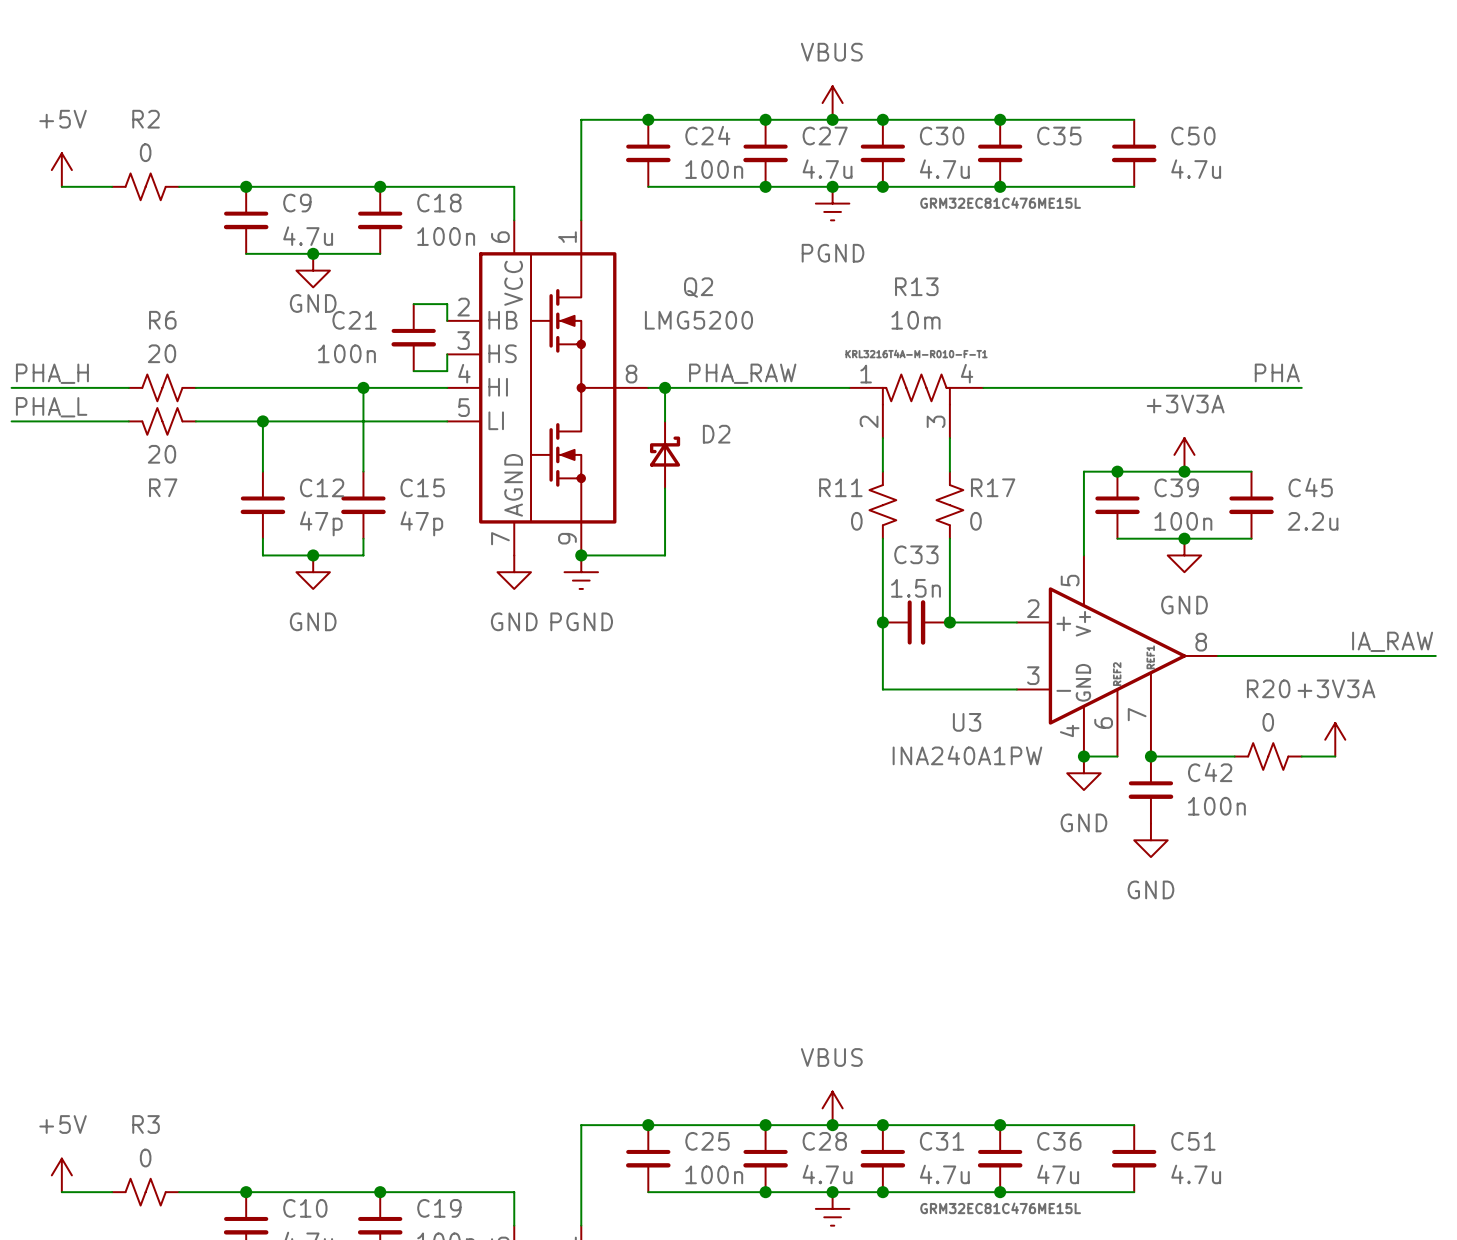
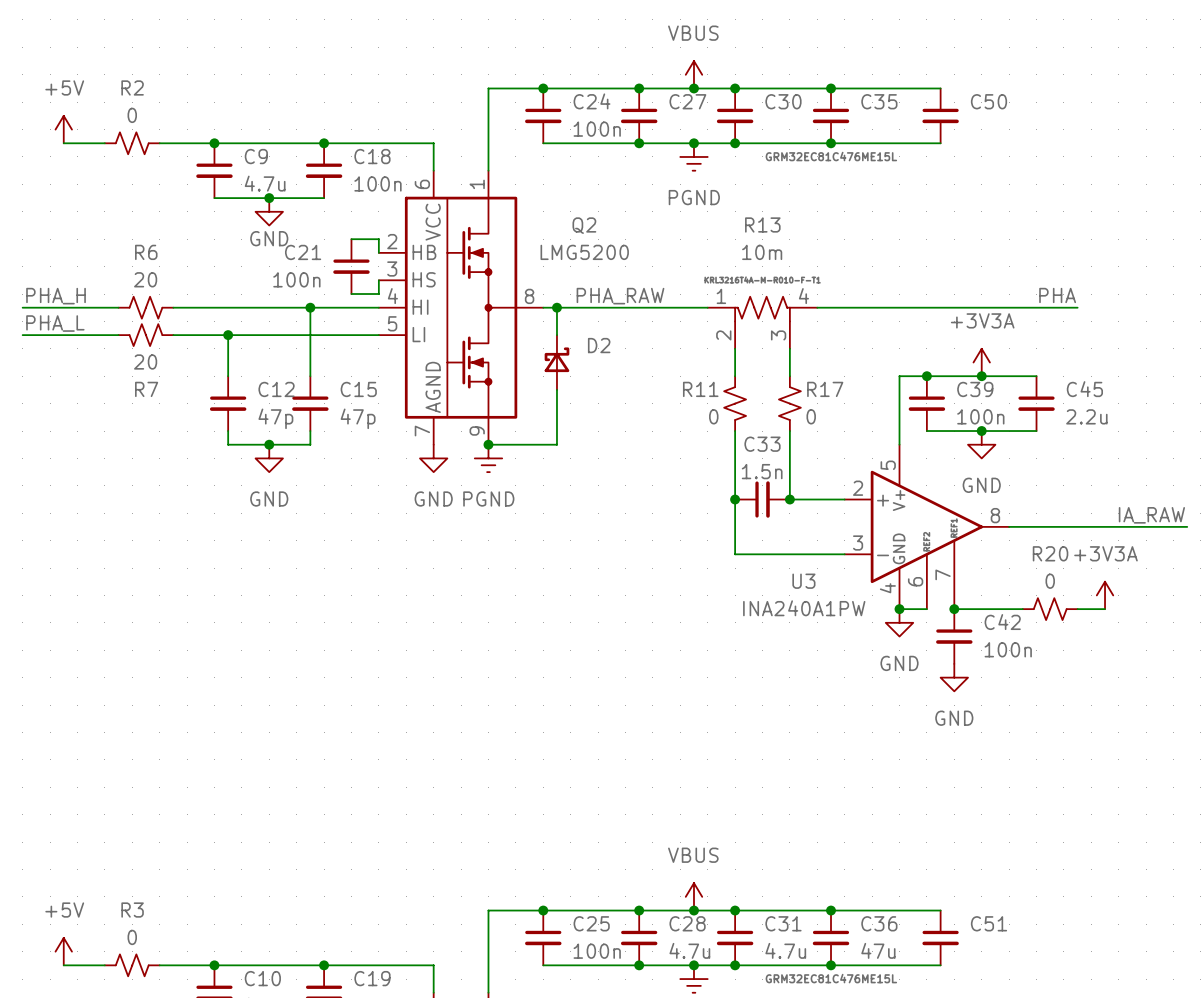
C27 value: 4.7u (827, 169) -> none
C30 value: 4.7u (944, 169) -> none
C50 value: 4.7u (1196, 169) -> none
C51 value: 4.7u (1196, 1174) -> none

